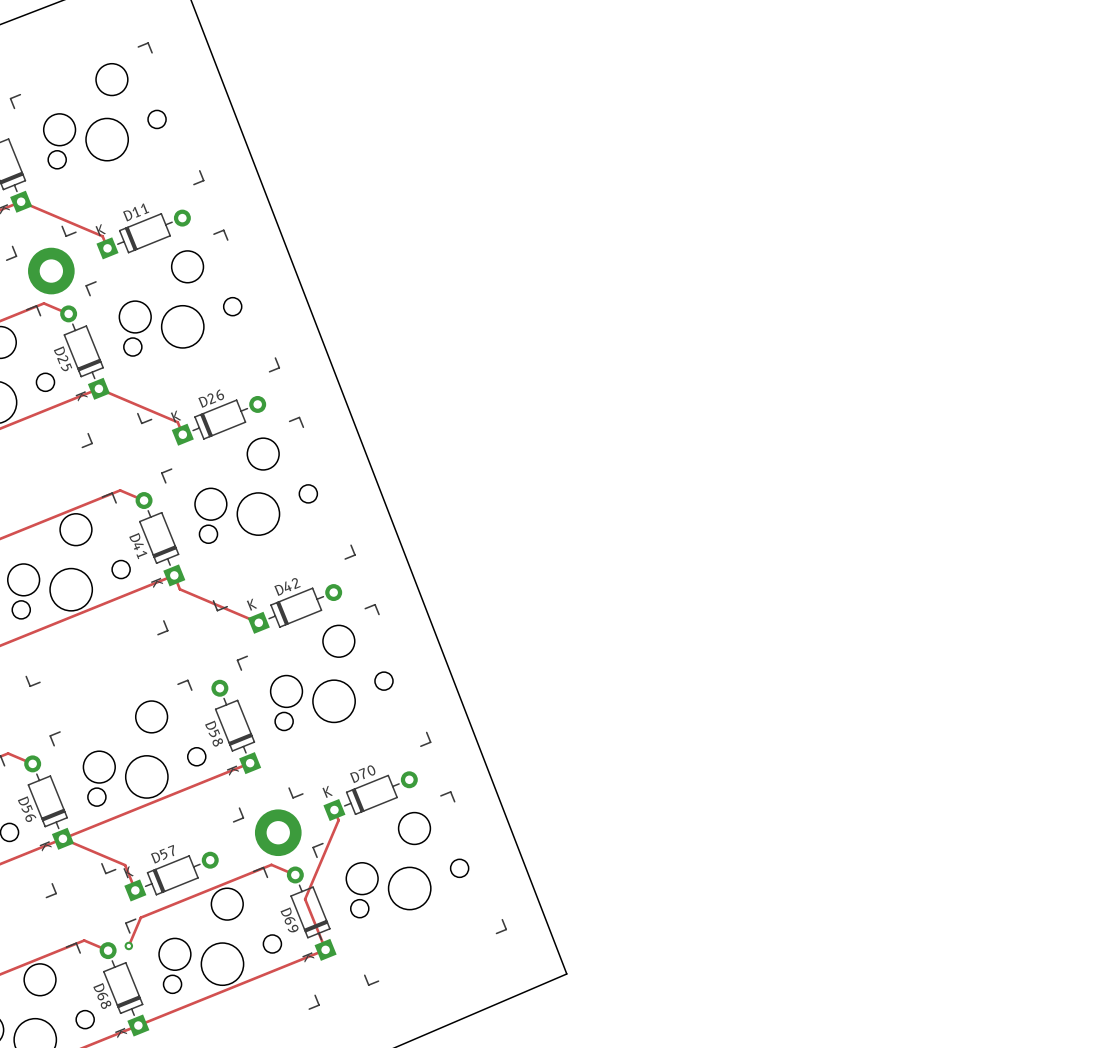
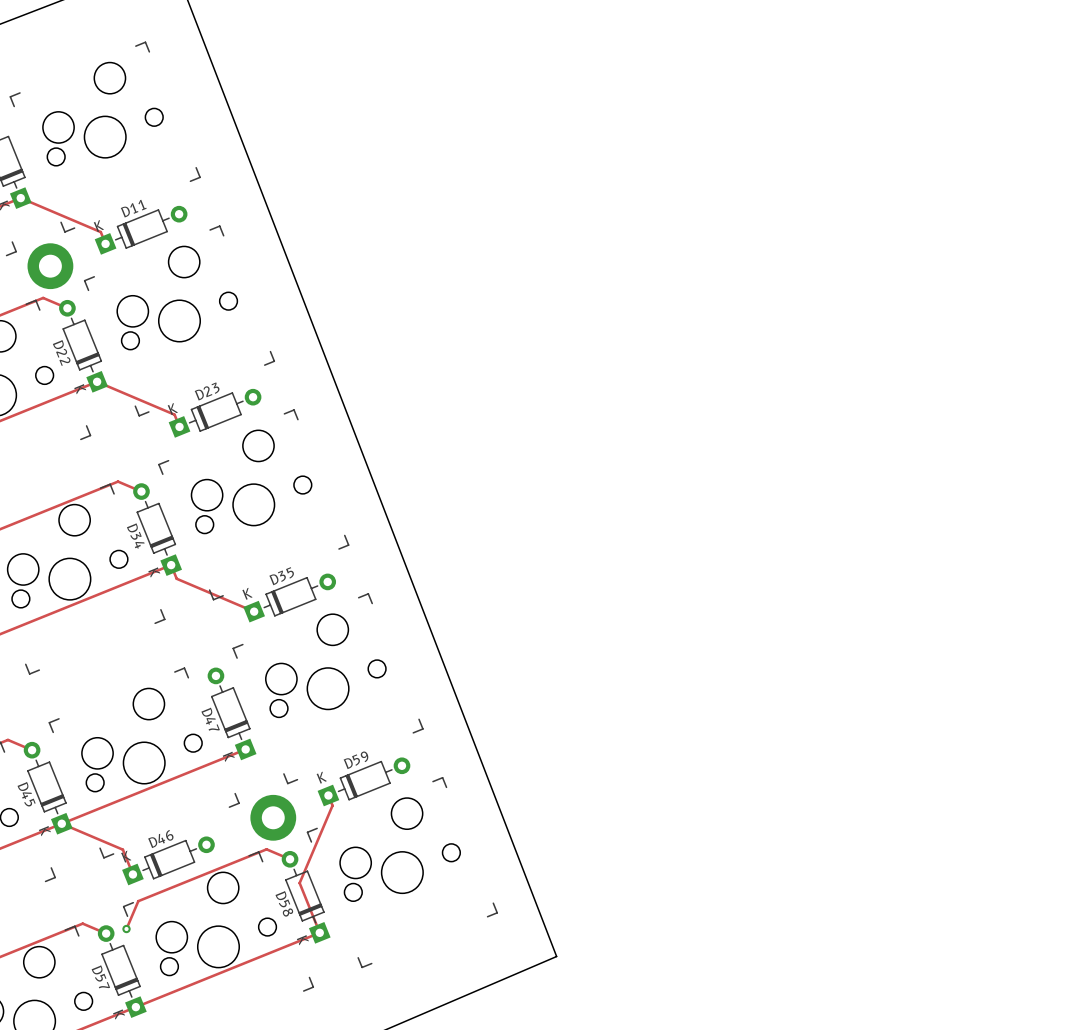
D25 name: D25 (63, 358) -> D22 (61, 352)
D26 name: D26 (211, 398) -> D23 (207, 391)
D41 name: D41 (138, 546) -> D34 (135, 535)
D42 name: D42 (287, 587) -> D35 (281, 576)
D58 name: D58 (214, 733) -> D47 (210, 719)
D70 name: D70 (362, 774) -> D59 (355, 760)
D56 name: D56 (27, 809) -> D45 (26, 794)
D57 name: D57 (162, 854) -> D46 (160, 839)
D69 name: D69 (289, 919) -> D58 (284, 903)
D68 name: D68 (102, 995) -> D57 (100, 976)

